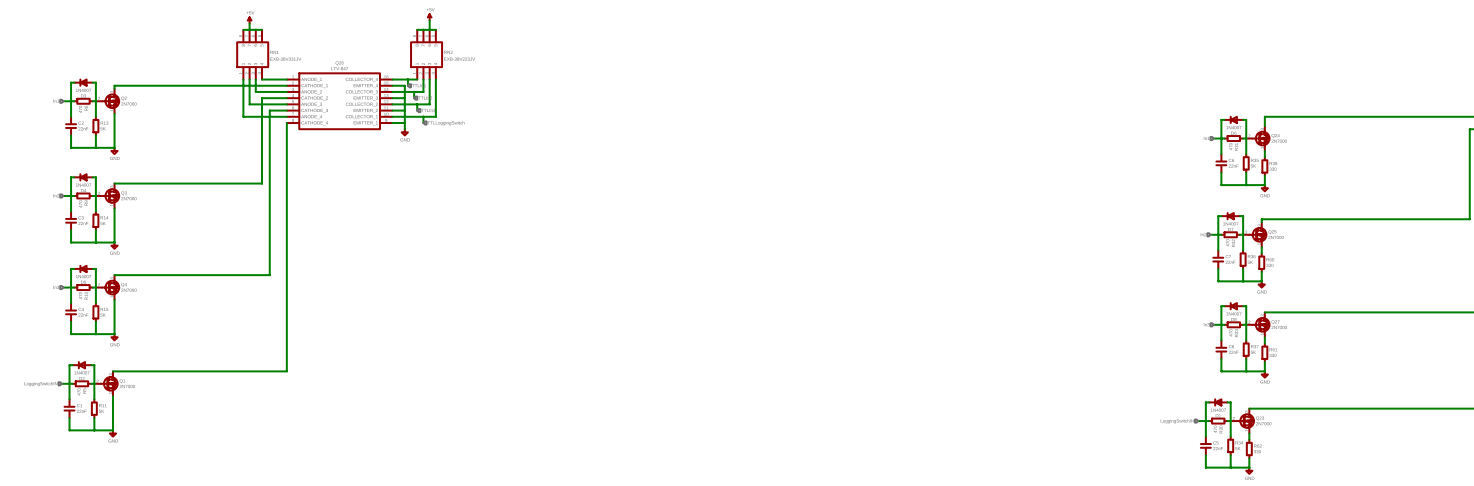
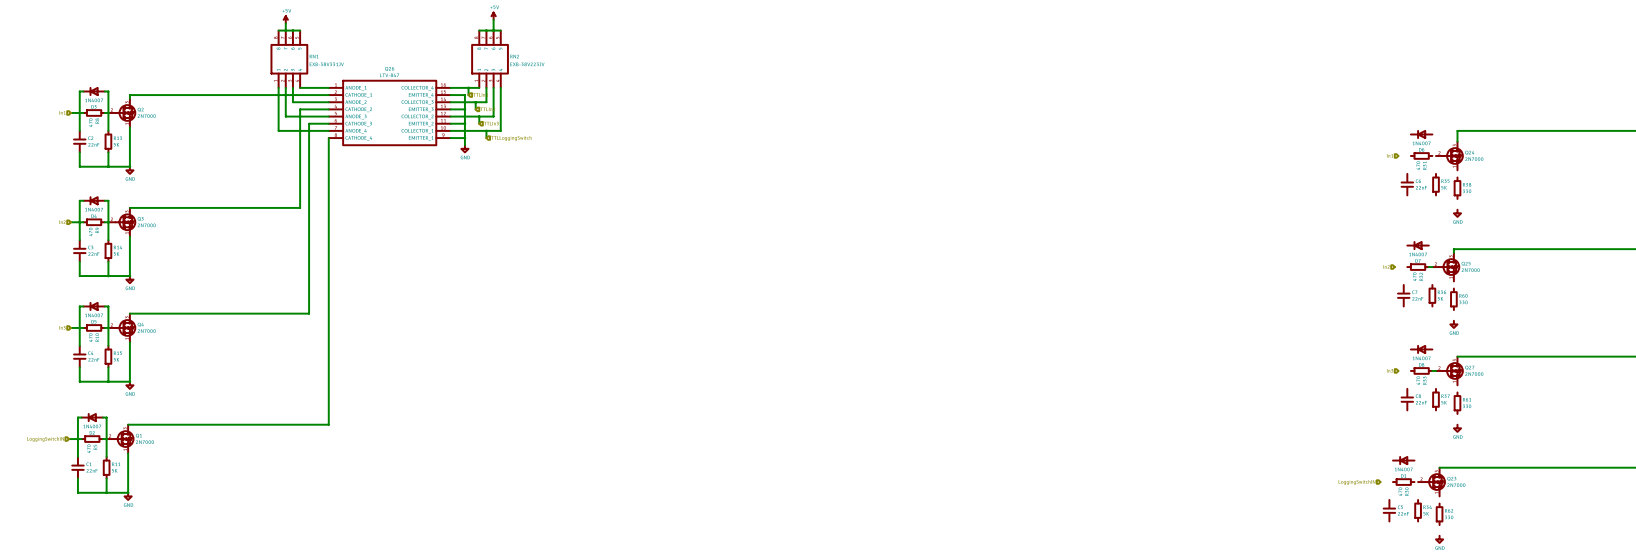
wire: (1224, 119) (1221, 119) (1221, 154) -> none
wire: (1243, 119) (1246, 119) (1246, 154) -> none
wire: (1213, 138) (1224, 138) -> none
wire: (1243, 138) (1246, 138) -> none
wire: (1264, 150) (1264, 157) -> none
wire: (1221, 172) (1221, 185) (1264, 185) (1264, 175) -> none
wire: (1246, 172) (1246, 185) -> none
wire: (1221, 216) (1218, 216) (1218, 250) -> none
wire: (1240, 216) (1243, 216) (1243, 250) -> none
wire: (1210, 234) (1221, 234) -> none
wire: (1261, 247) (1261, 253) -> none
wire: (1218, 268) (1218, 281) (1261, 281) (1261, 272) -> none
wire: (1243, 268) (1243, 281) -> none
wire: (1224, 306) (1221, 306) (1221, 340) -> none
wire: (1243, 306) (1246, 306) (1246, 340) -> none
wire: (1213, 324) (1224, 324) -> none
wire: (1264, 337) (1264, 343) -> none
wire: (1221, 358) (1221, 371) (1264, 371) (1264, 362) -> none
wire: (1246, 358) (1246, 371) -> none
wire: (1208, 402) (1205, 402) (1205, 436) -> none
wire: (1227, 402) (1230, 402) (1230, 436) -> none
wire: (1198, 421) (1208, 421) -> none
wire: (1227, 421) (1230, 421) -> none
wire: (1249, 433) (1249, 439) -> none
wire: (1205, 455) (1205, 467) (1249, 467) (1249, 458) -> none
wire: (1230, 455) (1230, 467) -> none

